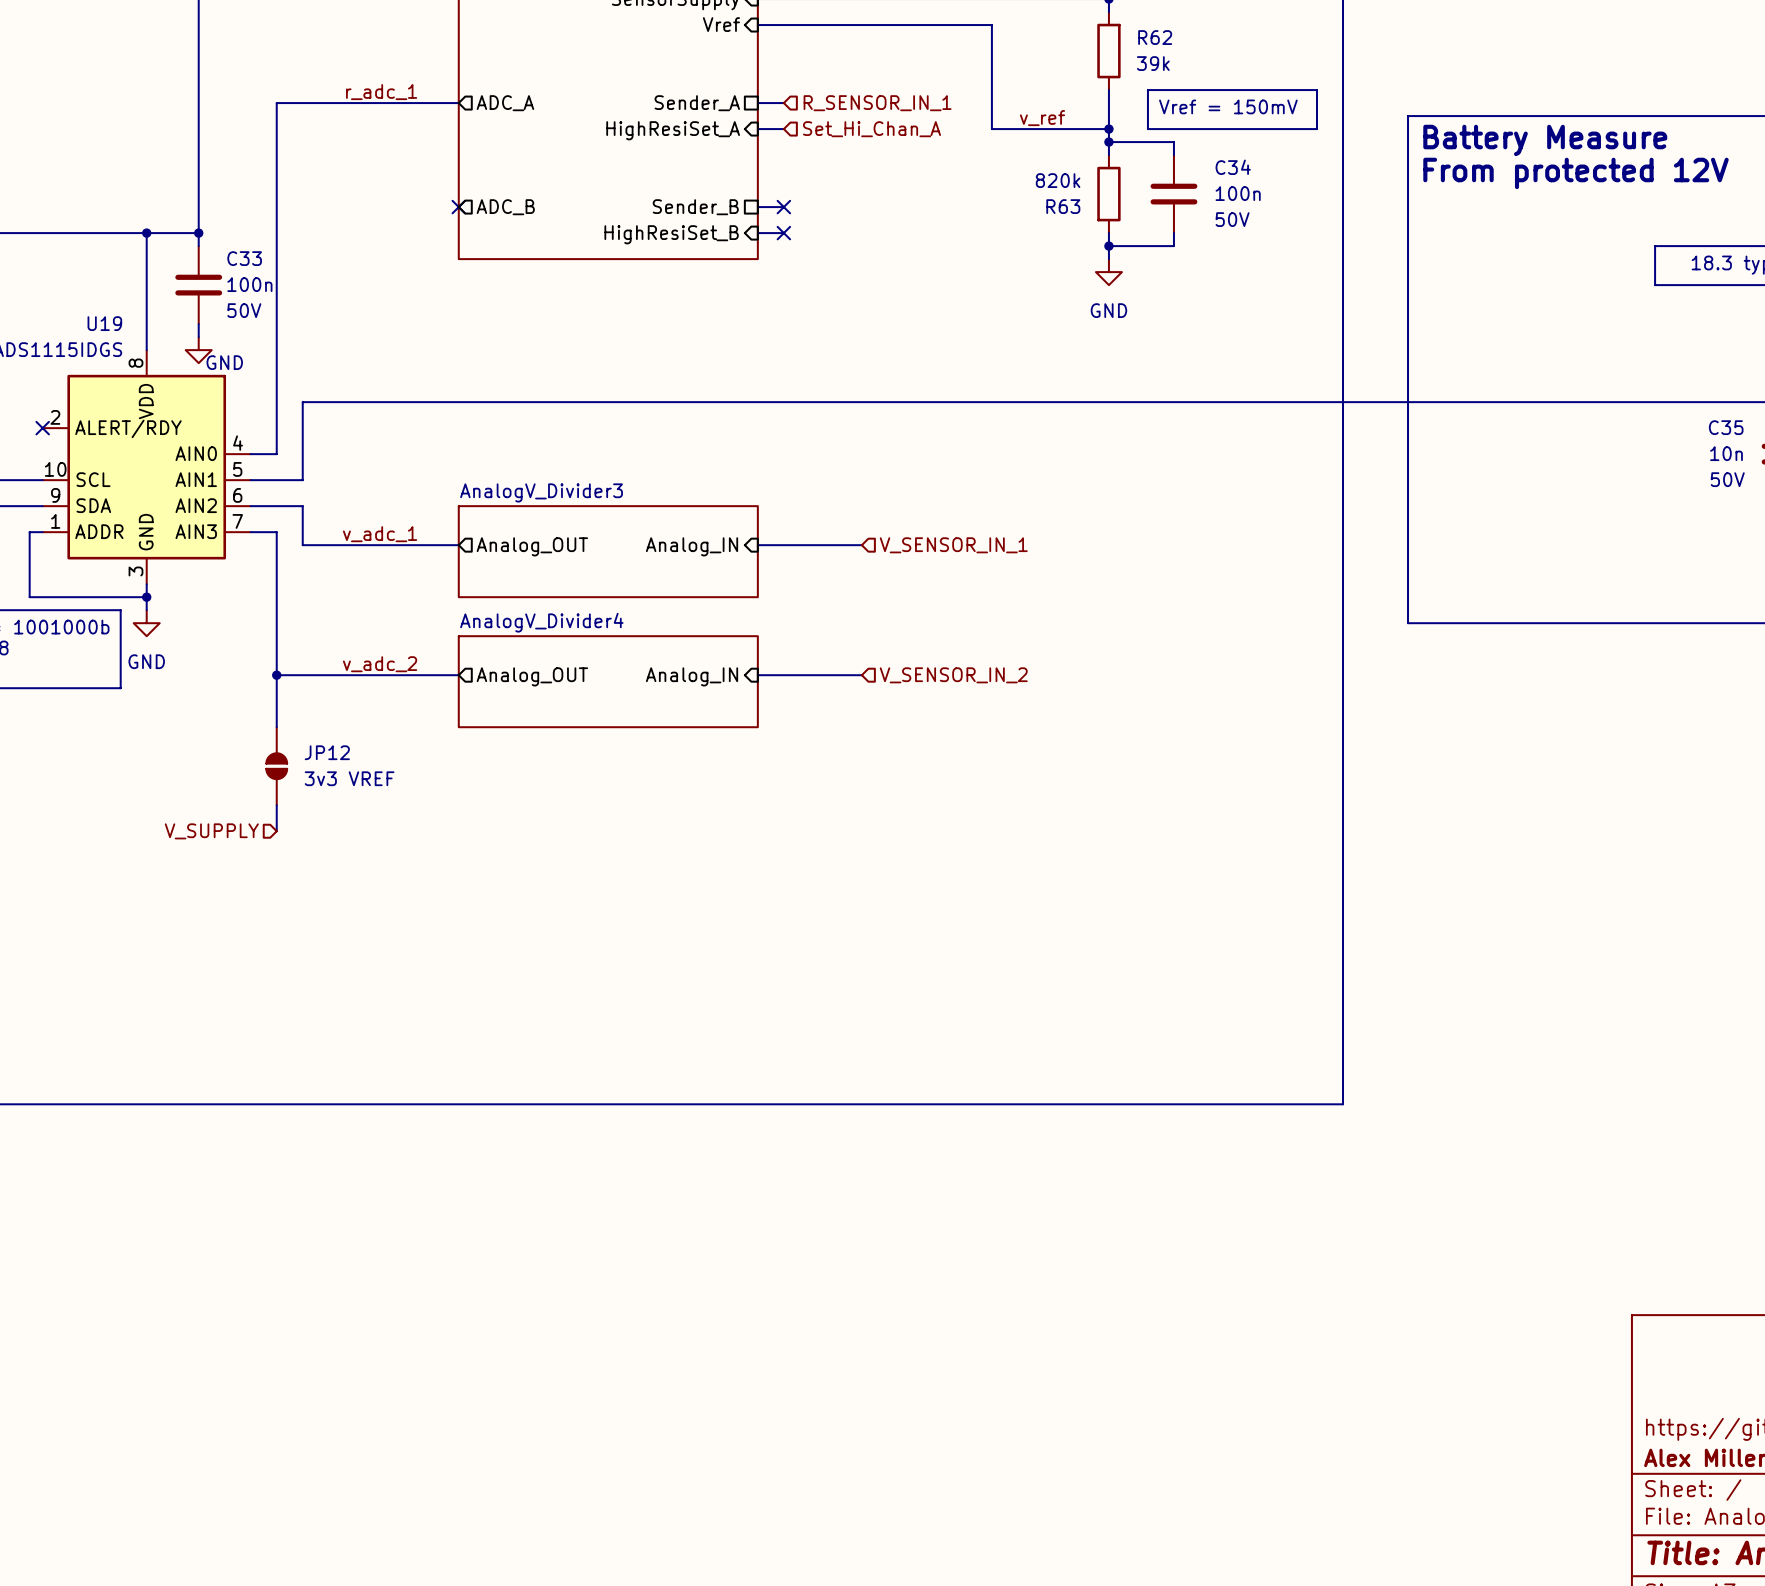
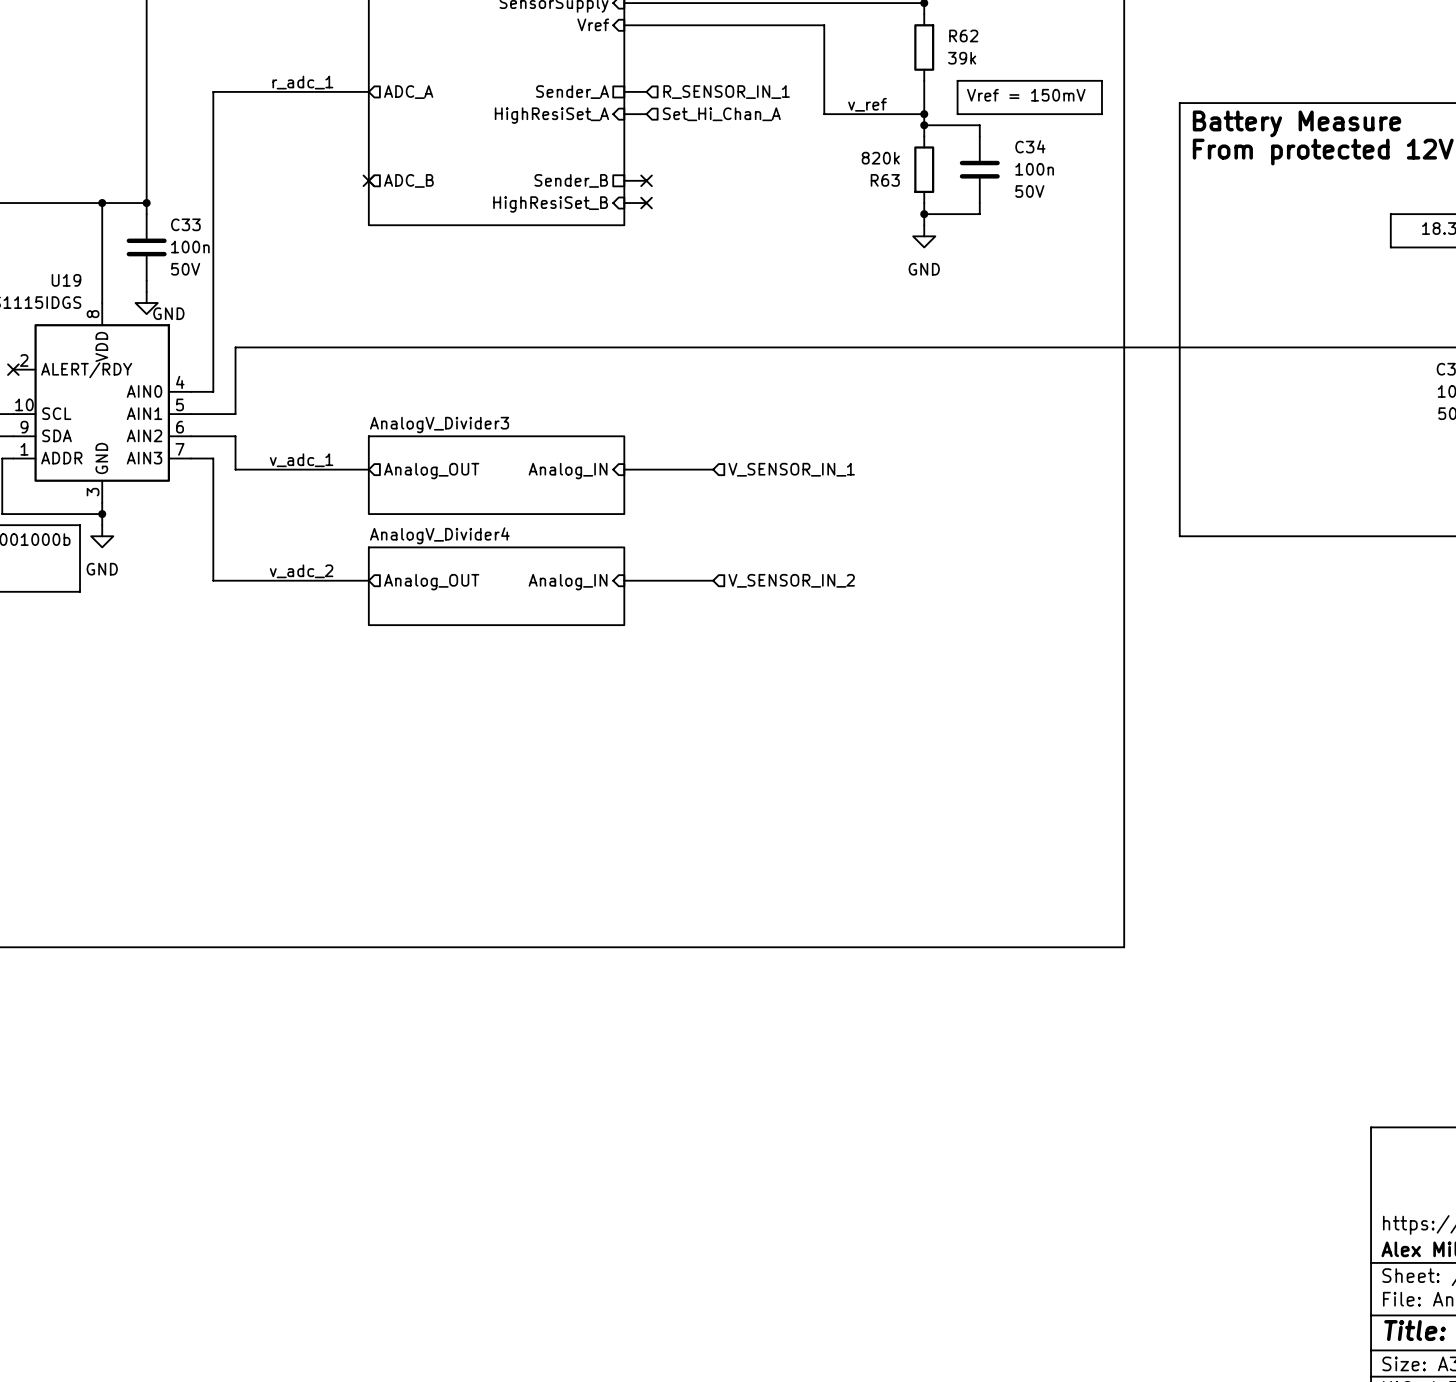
wire: (276, 675) (276, 727) -> none
junction: (276, 675) -> none
JP12: 3v3 VREF (276, 766) -> none
wire: (276, 805) (276, 831) -> none
hierarchical label: V_SUPPLY (211, 831) -> none

